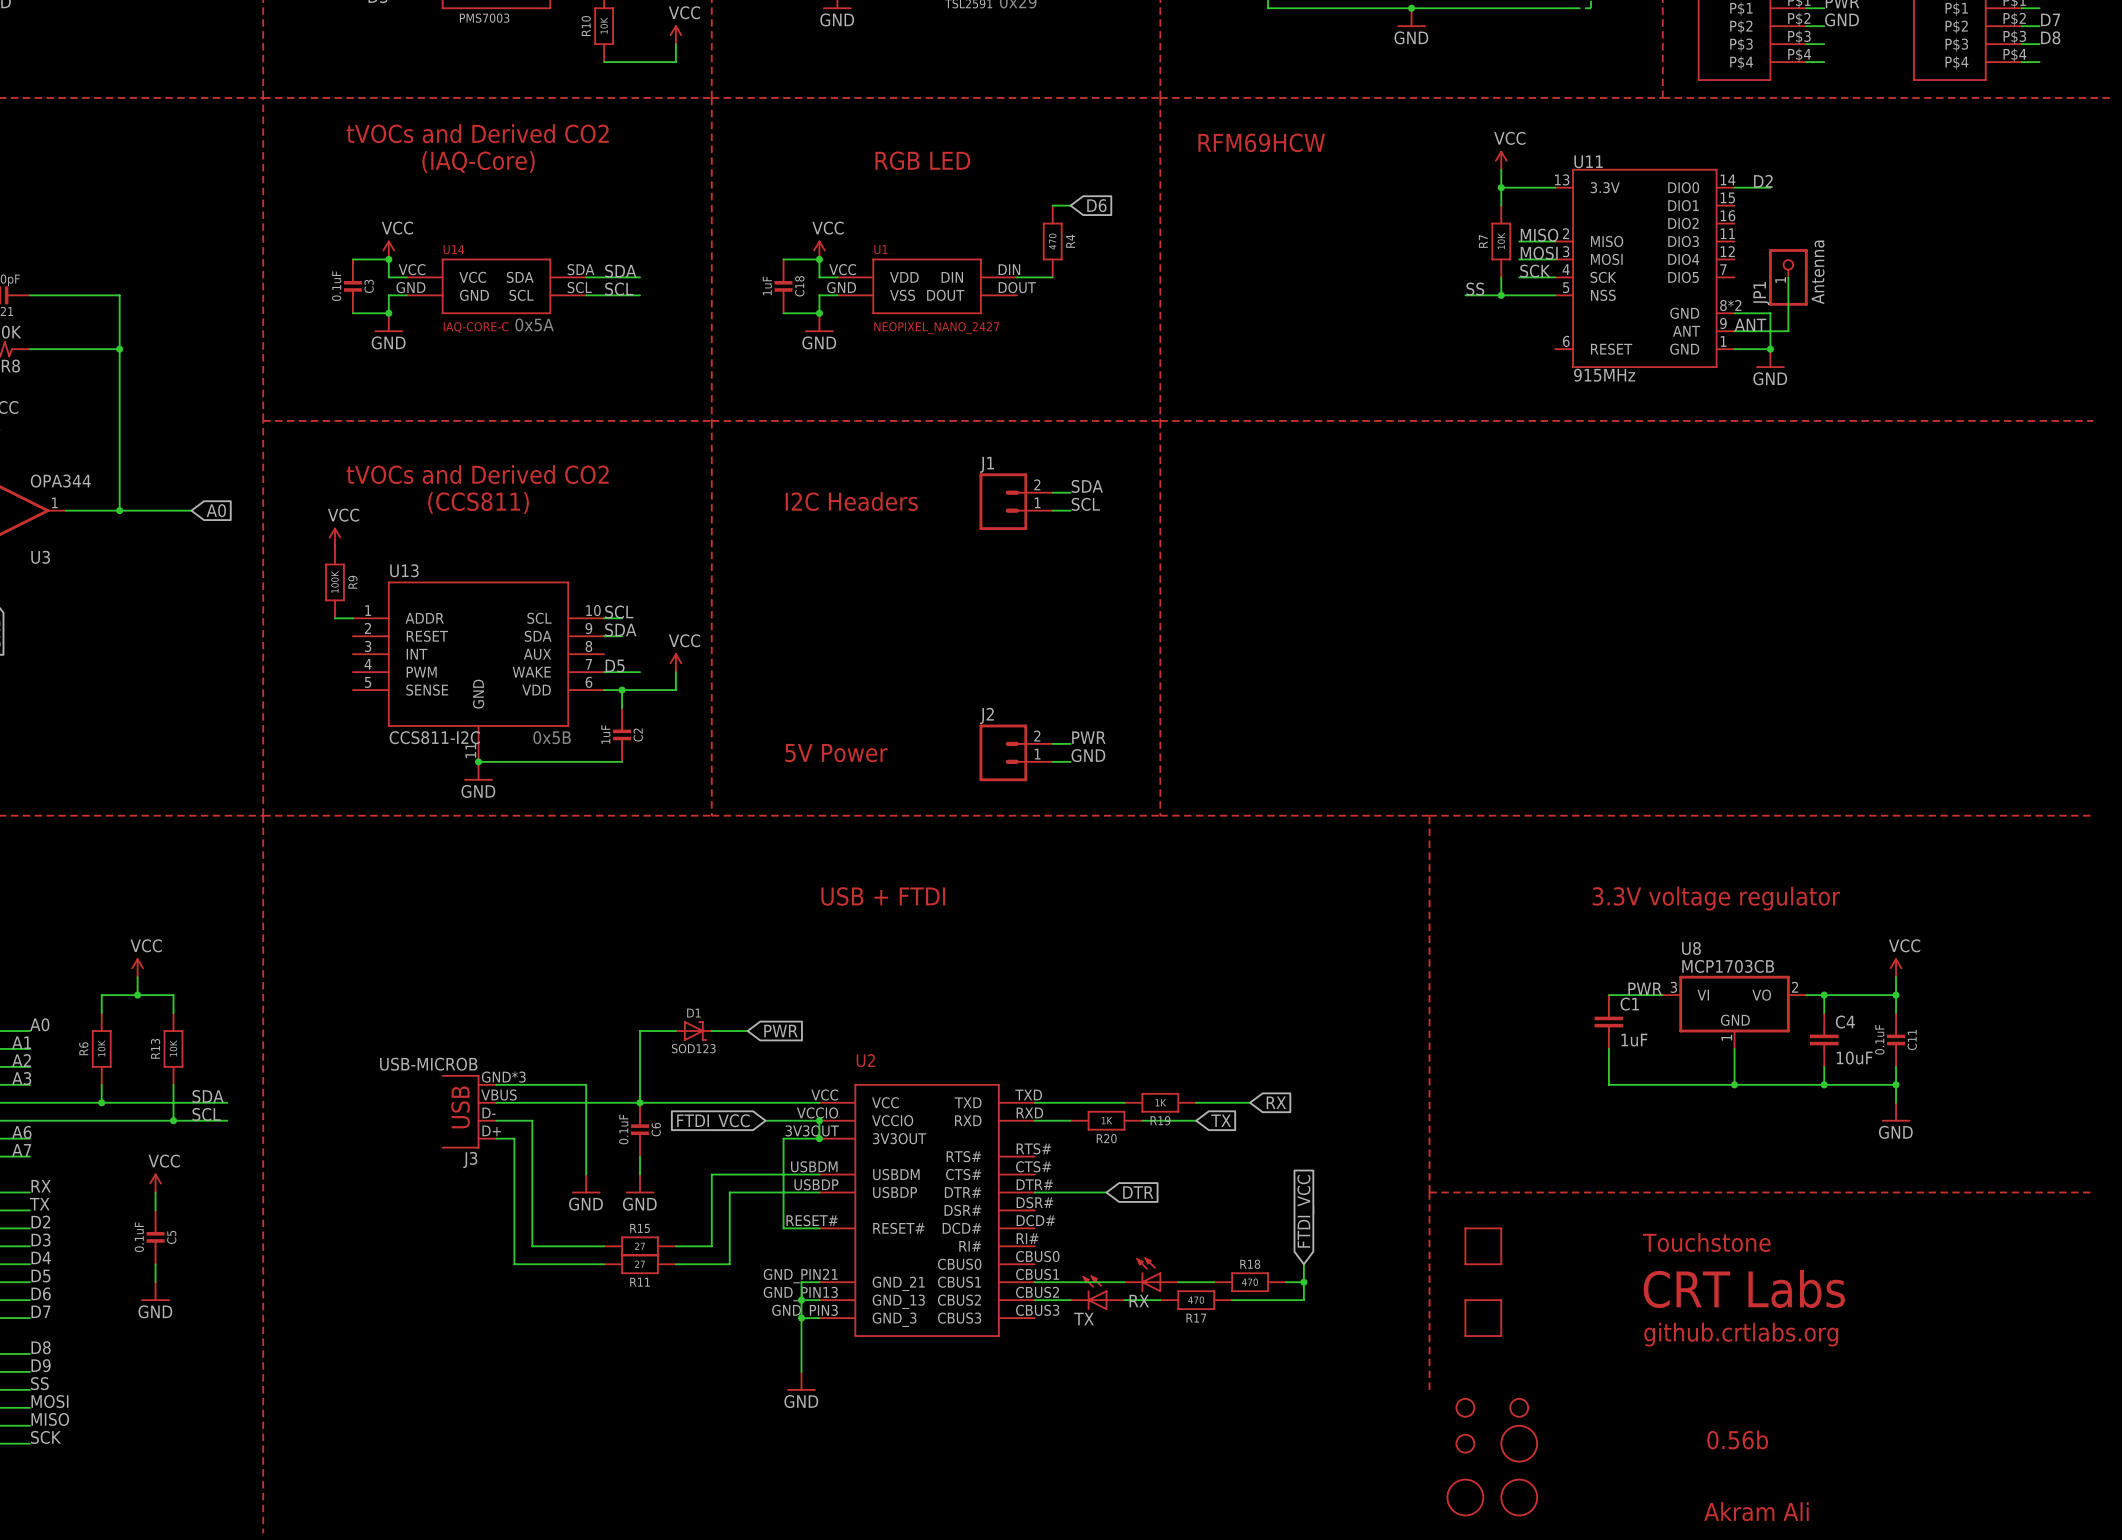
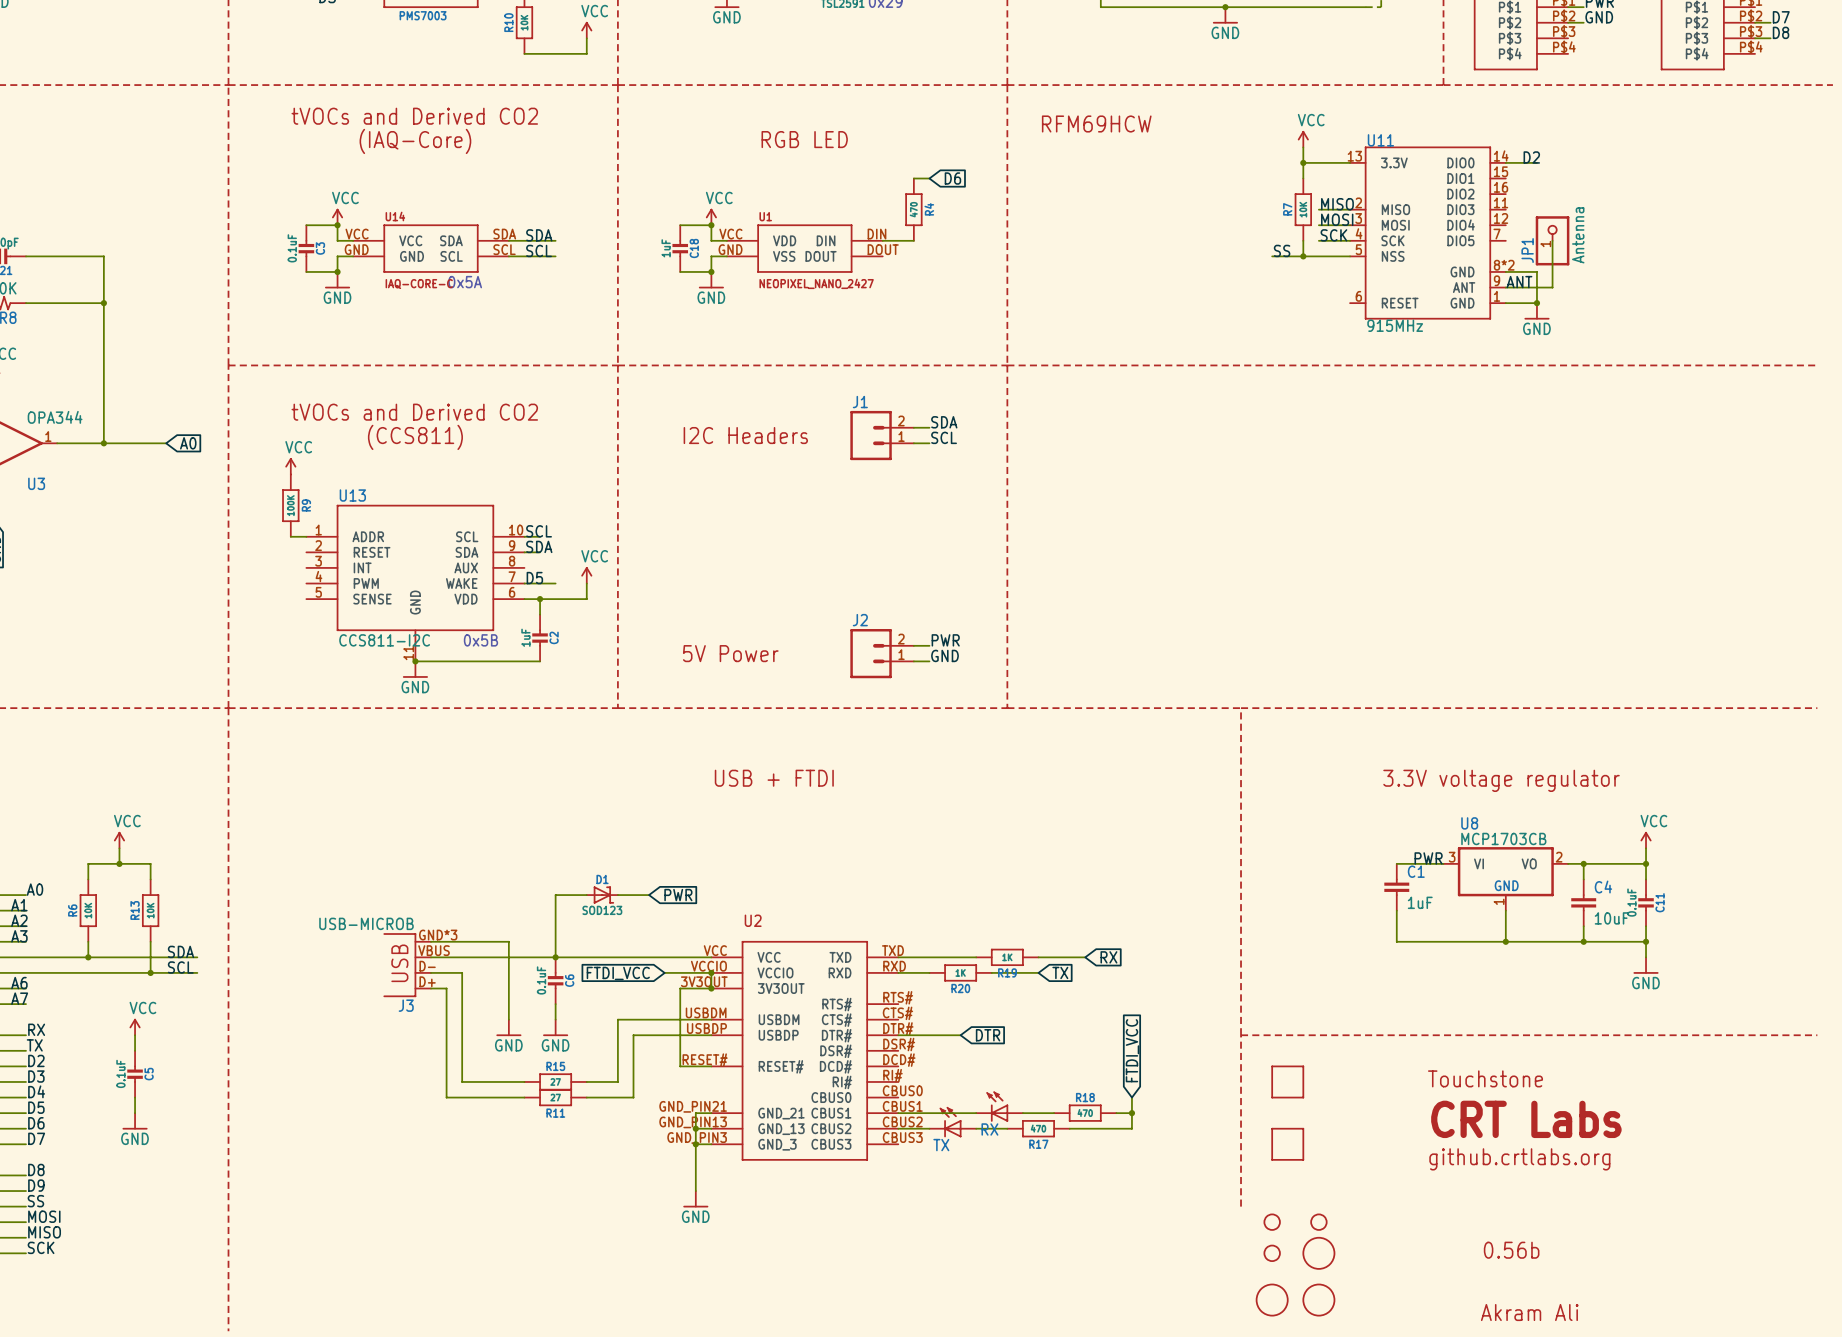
wire: (2021, 8) (2039, 8) -> none
wire: (1806, 44) (1824, 44) -> none
wire: (1806, 62) (1824, 62) -> none
wire: (2021, 62) (2039, 62) -> none

